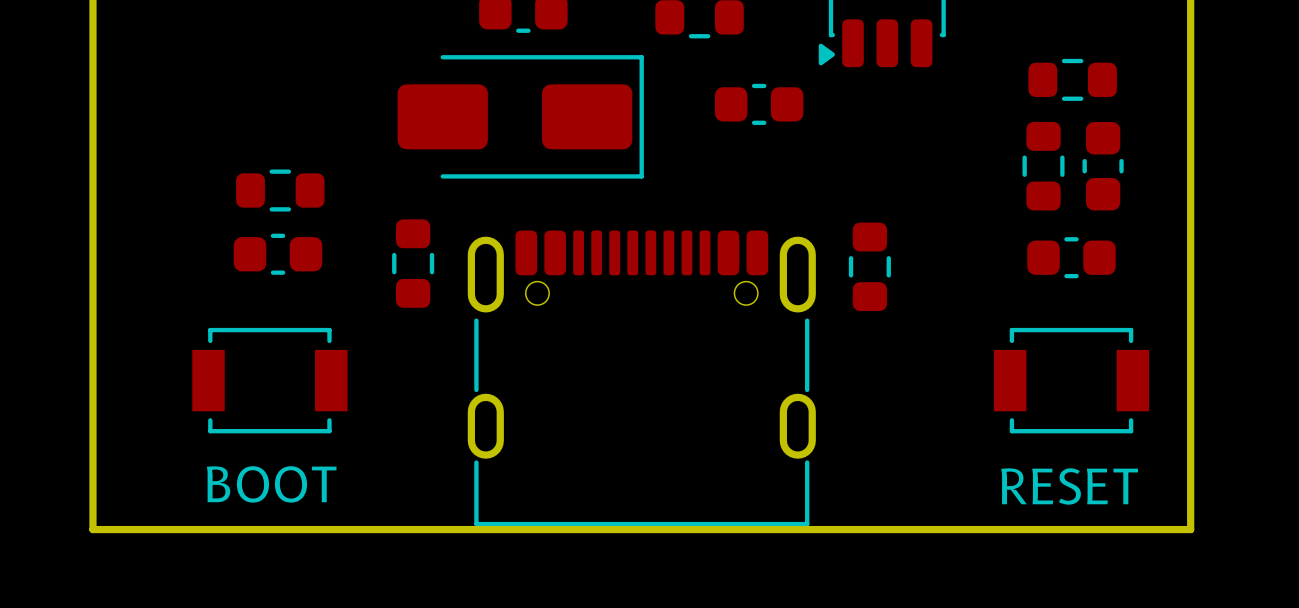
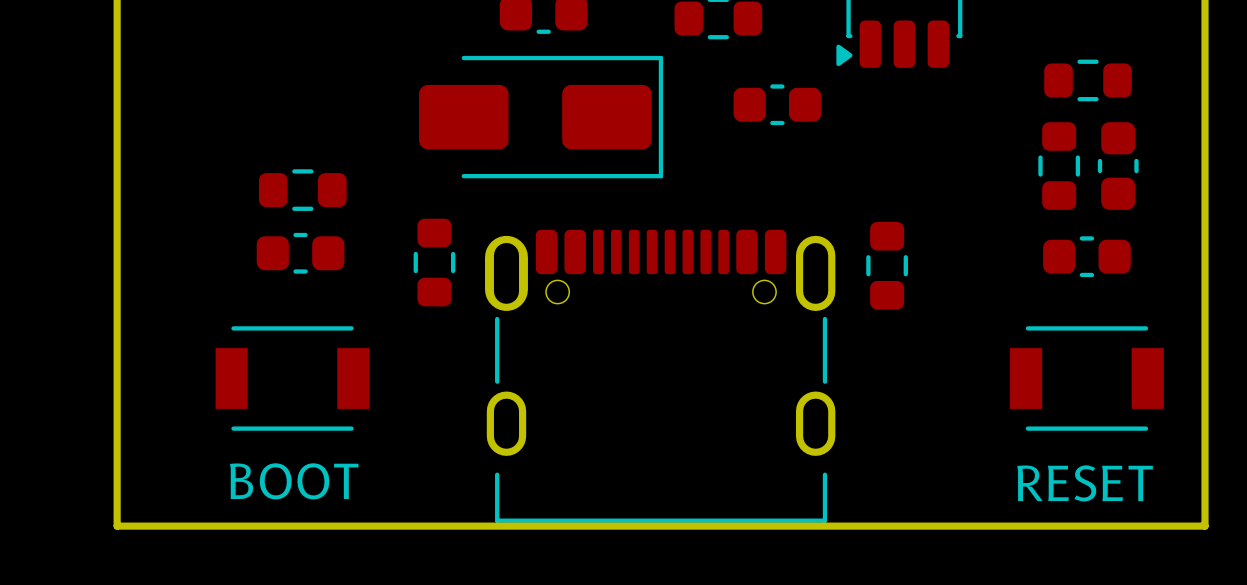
part footprint: [467, 230, 816, 527] -> [485, 229, 836, 523]
BOOT footprint: [192, 327, 348, 434] -> [215, 326, 370, 431]
RESET footprint: [993, 327, 1150, 434] -> [1009, 326, 1164, 431]

